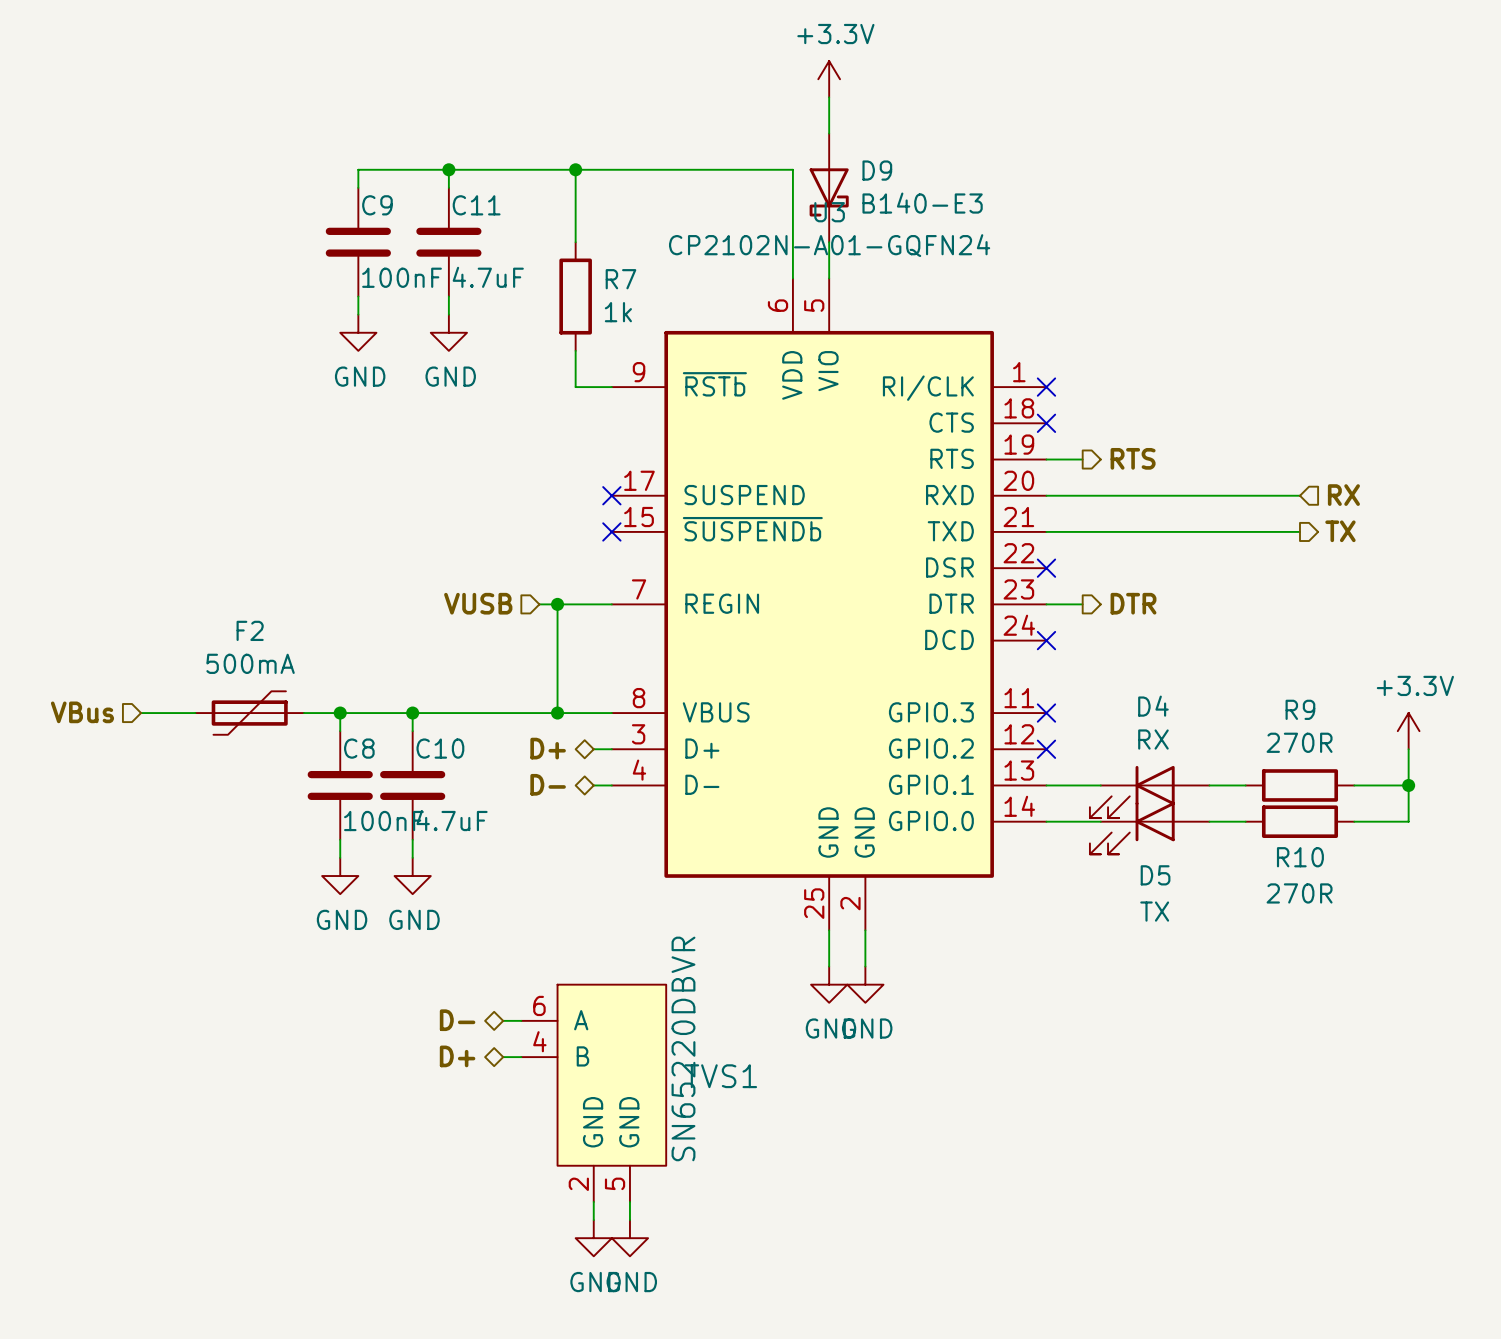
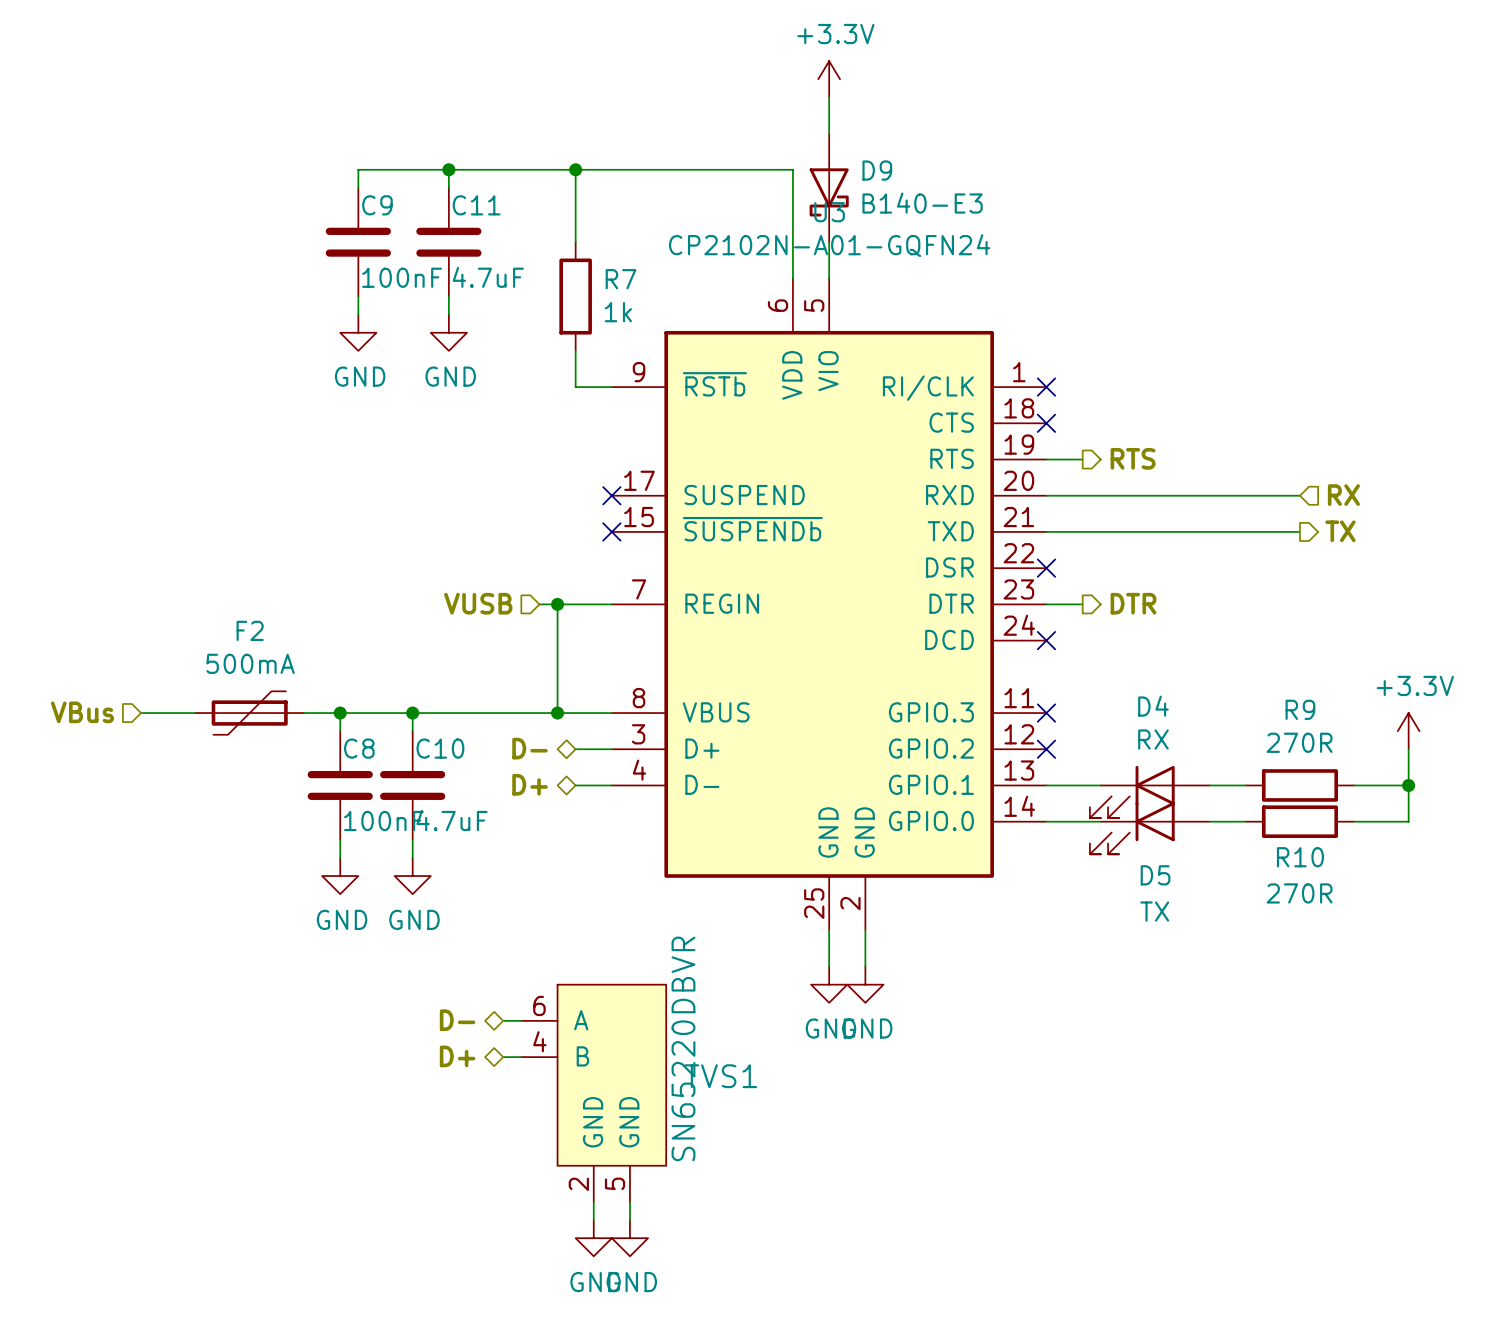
hierarchical label position: D+ (548, 748) -> D+ (530, 784)
wire: none -> (575, 749) (593, 749)
hierarchical label position: D- (548, 784) -> D- (530, 748)
wire: none -> (575, 785) (593, 785)

